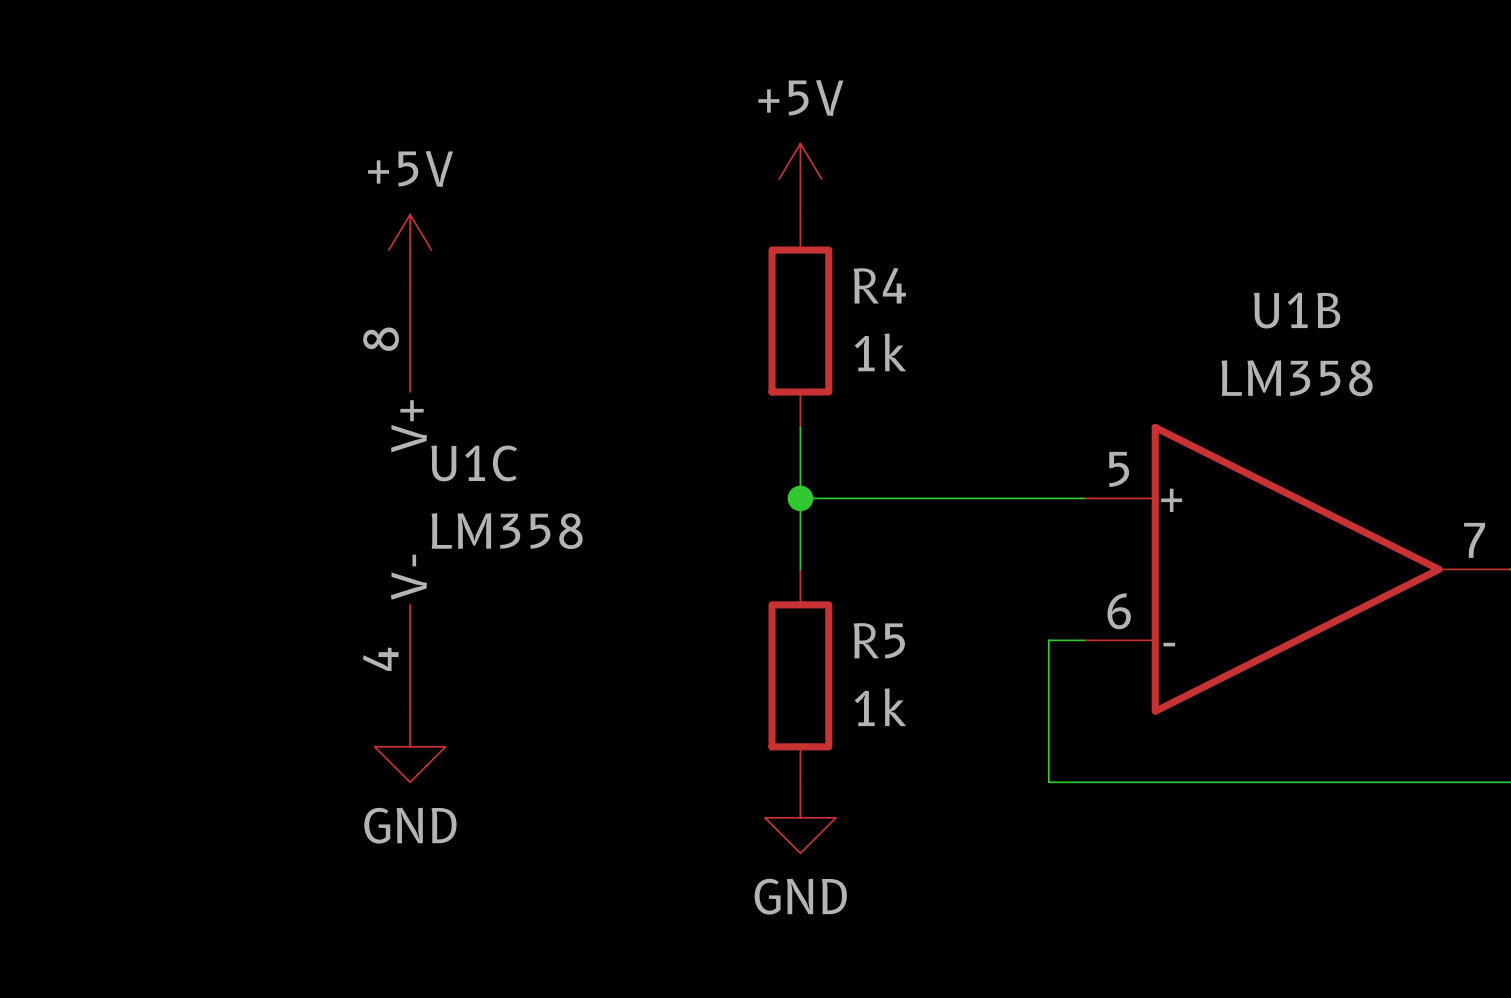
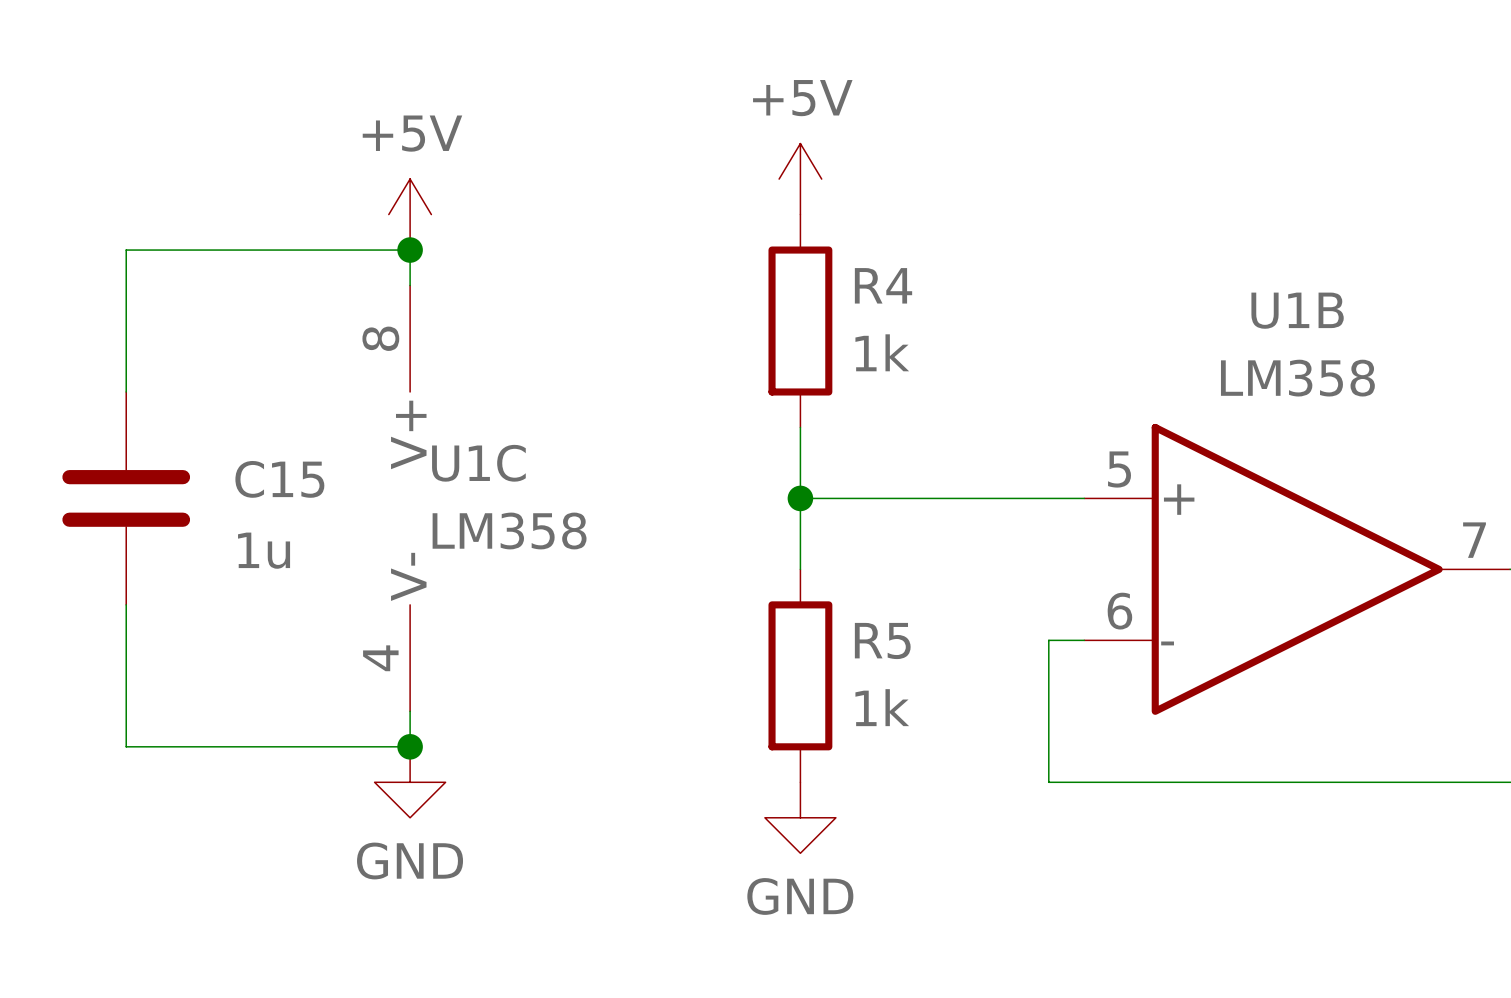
power symbol position: +5V (410, 250) -> +5V (410, 214)
junction: none -> (410, 250)
wire: none -> (410, 285) (410, 250) (126, 250) (126, 391)
C15: none -> 1u (126, 498)
wire: none -> (126, 604) (126, 746) (410, 746) (410, 711)
power symbol position: GND (410, 746) -> GND (410, 782)
junction: none -> (410, 746)

